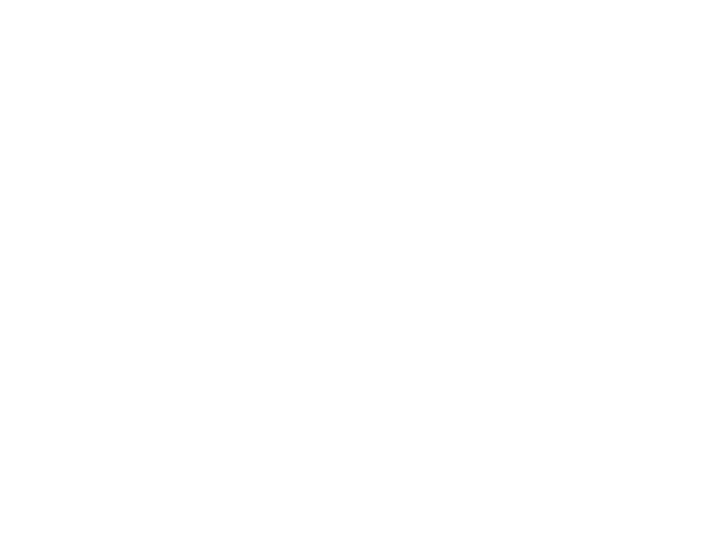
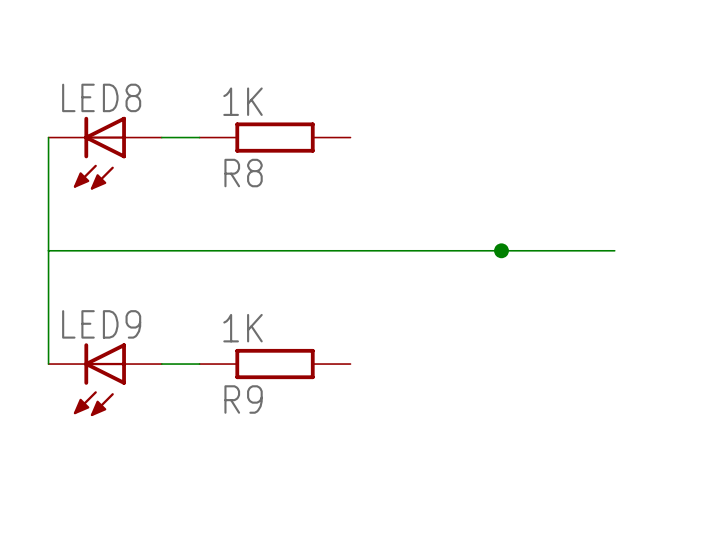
wire: none -> (48, 137) (48, 364)
wire: none -> (161, 137) (199, 137)
R8: none -> 1K (275, 137)
LED8: none -> (105, 153)
wire: none -> (48, 250) (614, 250)
junction: none -> (501, 250)
wire: none -> (161, 364) (199, 364)
R9: none -> 1K (275, 364)
LED9: none -> (105, 379)

